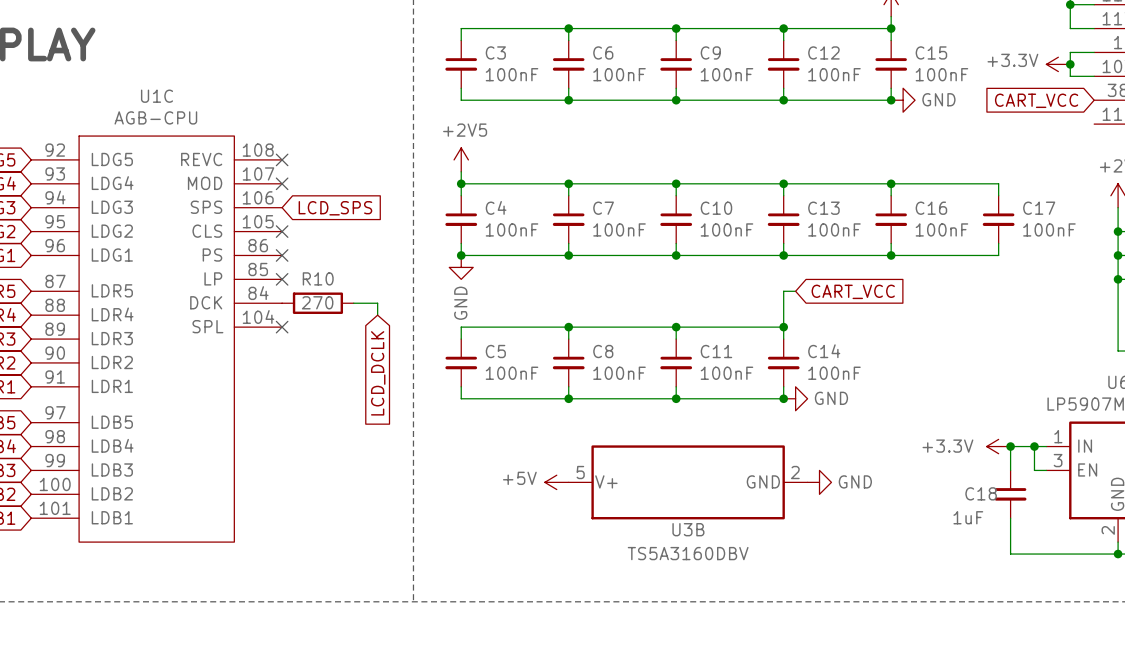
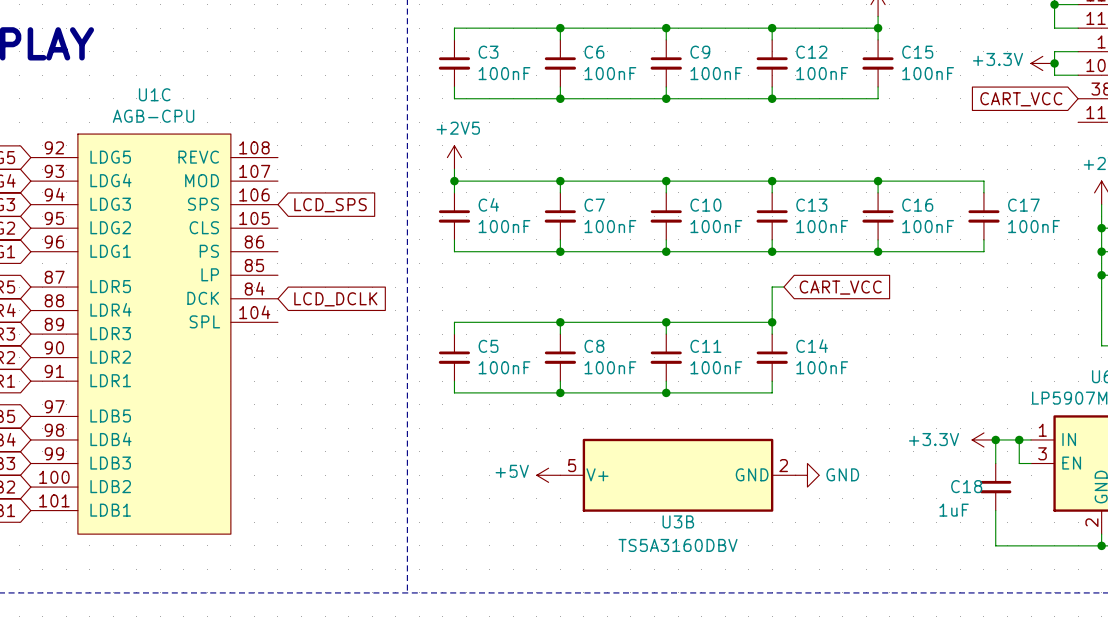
junction: (891, 100) -> none
power symbol: GND (903, 100) -> none
no-connect mark: (282, 159) -> none
no-connect mark: (282, 183) -> none
no-connect mark: (282, 231) -> none
no-connect mark: (282, 255) -> none
junction: (461, 255) -> none
power symbol: GND (461, 267) -> none
no-connect mark: (282, 279) -> none
R10: 270 (317, 303) -> none
wire: (353, 303) (377, 303) (377, 315) -> none
no-connect mark: (282, 327) -> none
global label rotation: 0° (378, 373) -> 90° counterclockwise (335, 299)
junction: (783, 398) -> none
power symbol: GND (795, 398) -> none

